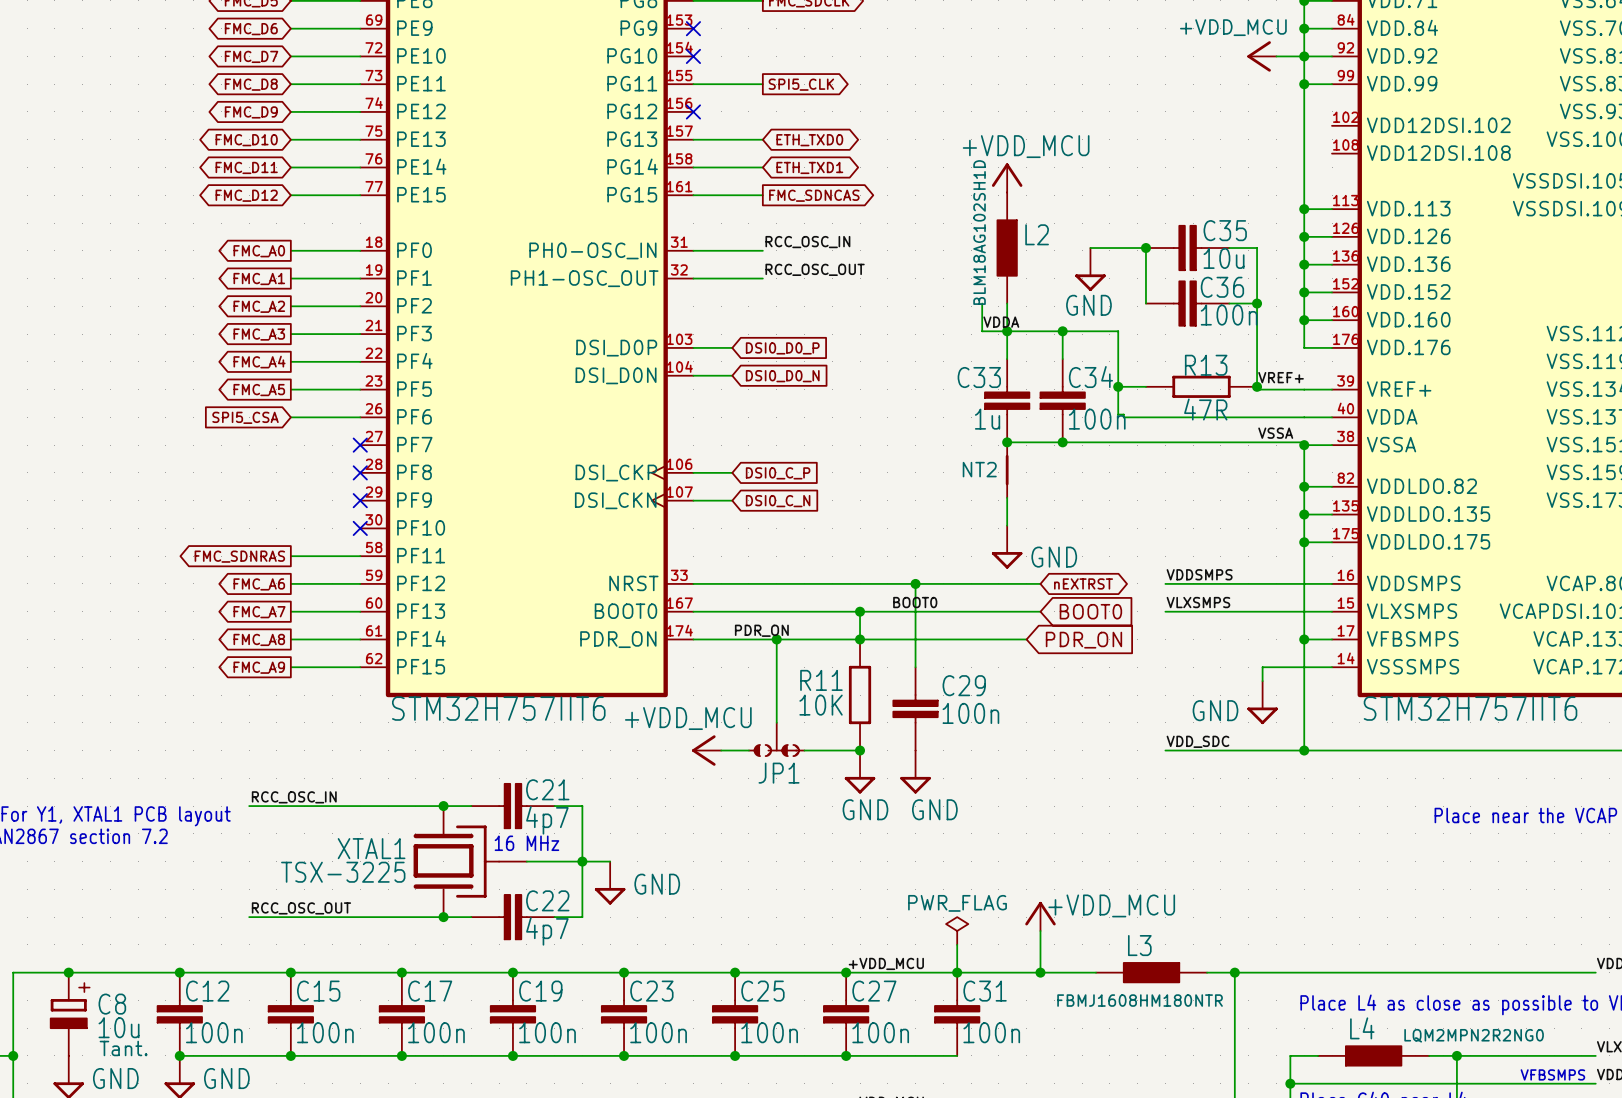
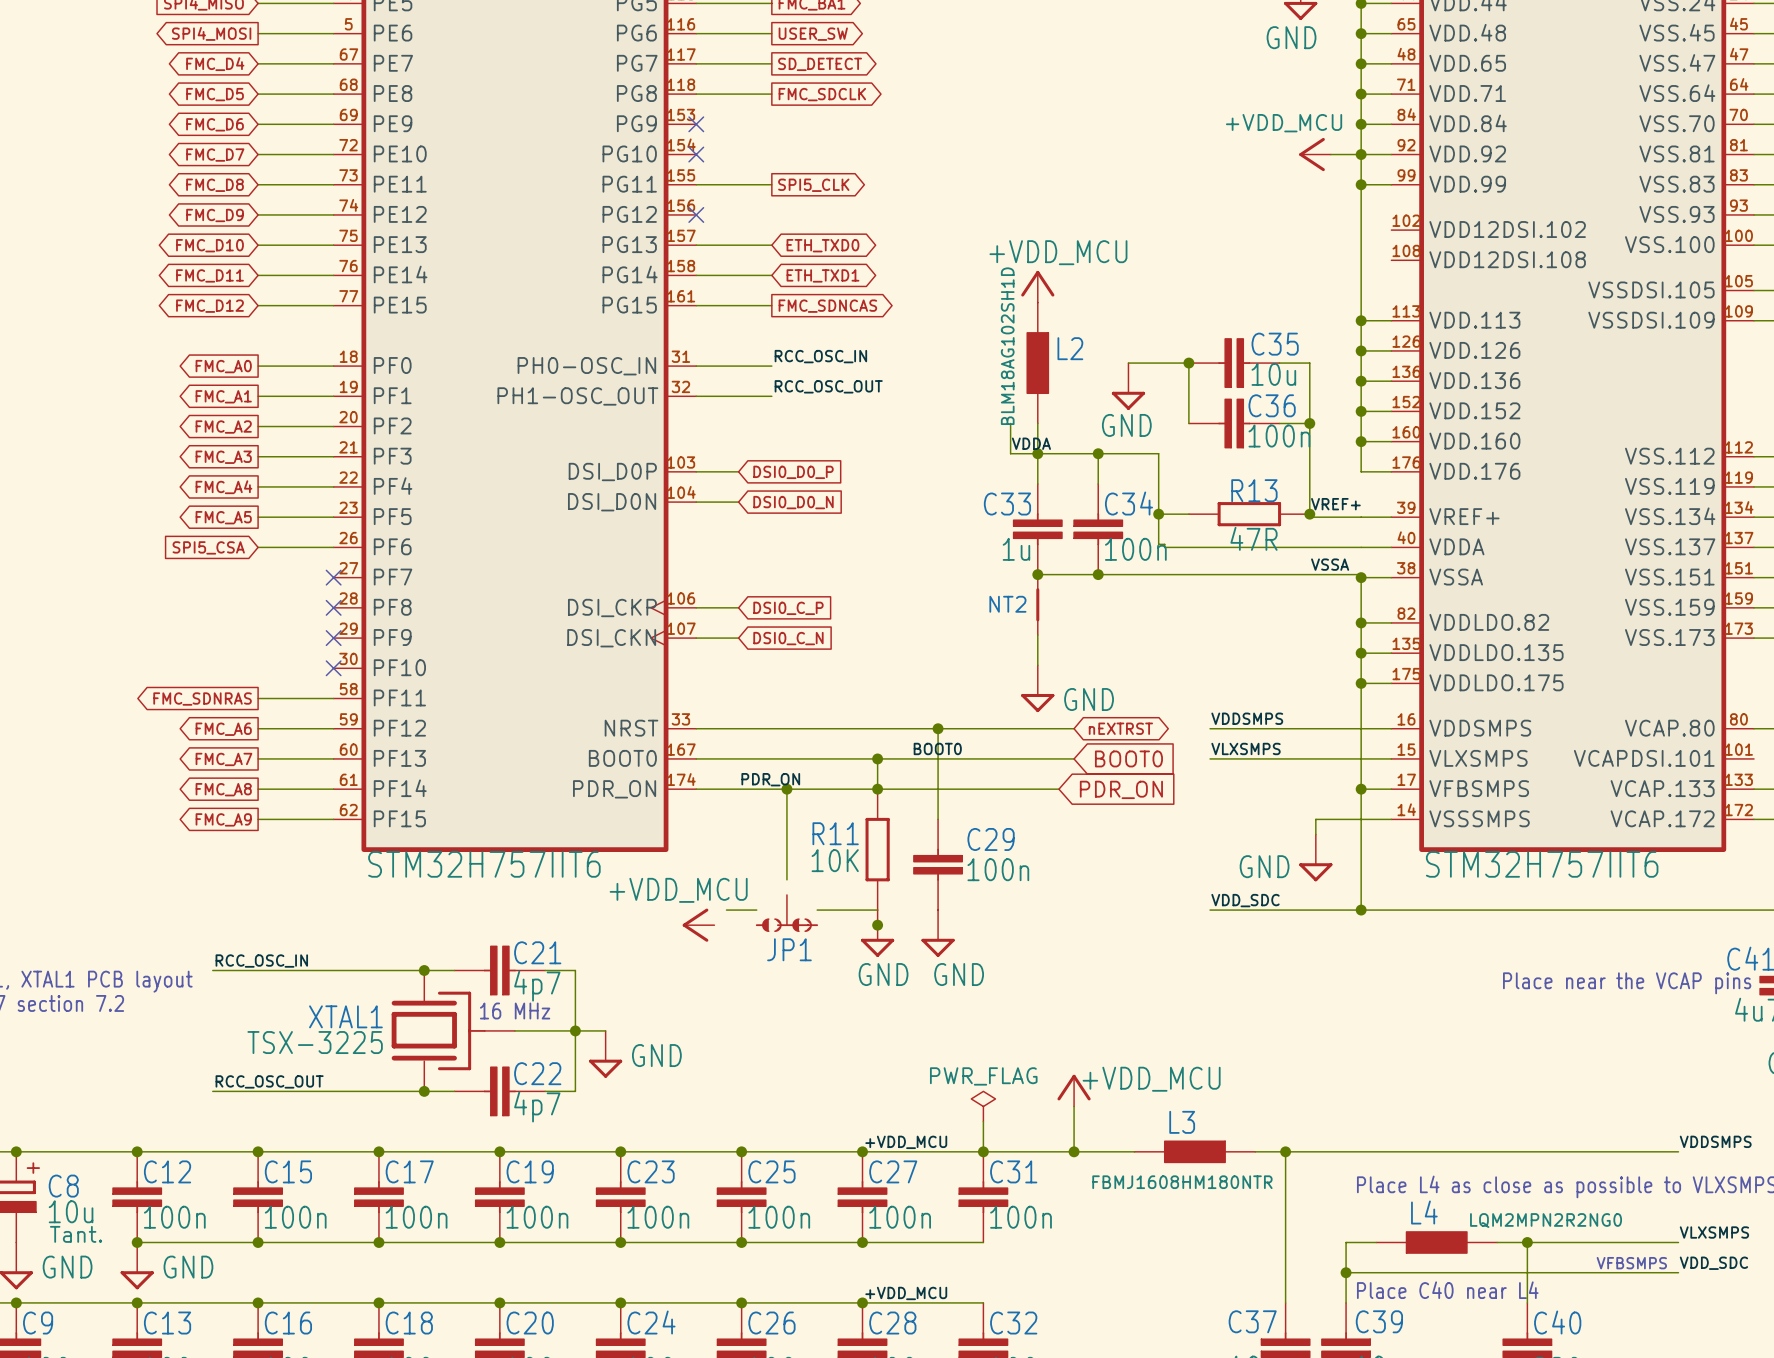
JP1 position: (776, 739) -> (786, 913)
power symbol position: +VDD_MCU (706, 750) -> +VDD_MCU (698, 925)
junction position: (860, 750) -> (877, 925)

